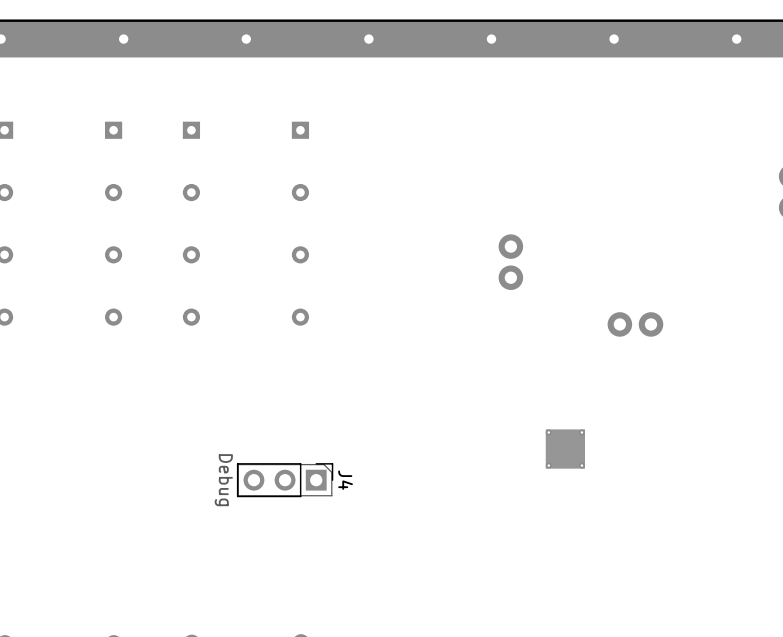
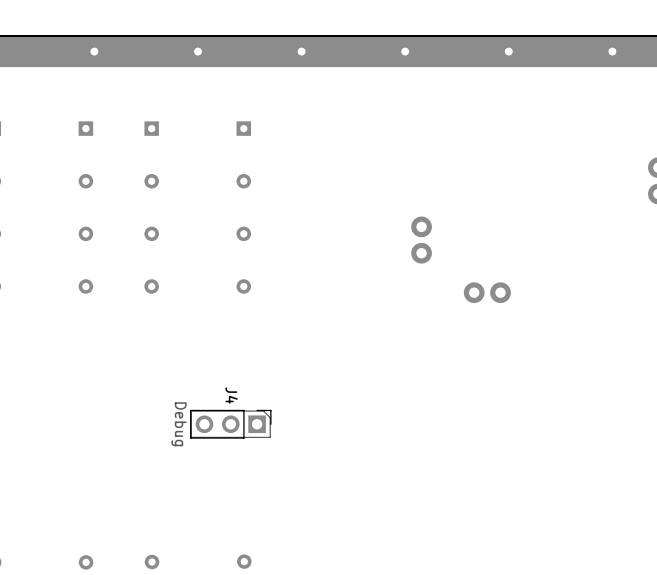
part position: (635, 324) -> (487, 292)
part: (565, 449) -> none
J4 name position: J4 (345, 480) -> J4 (231, 395)

